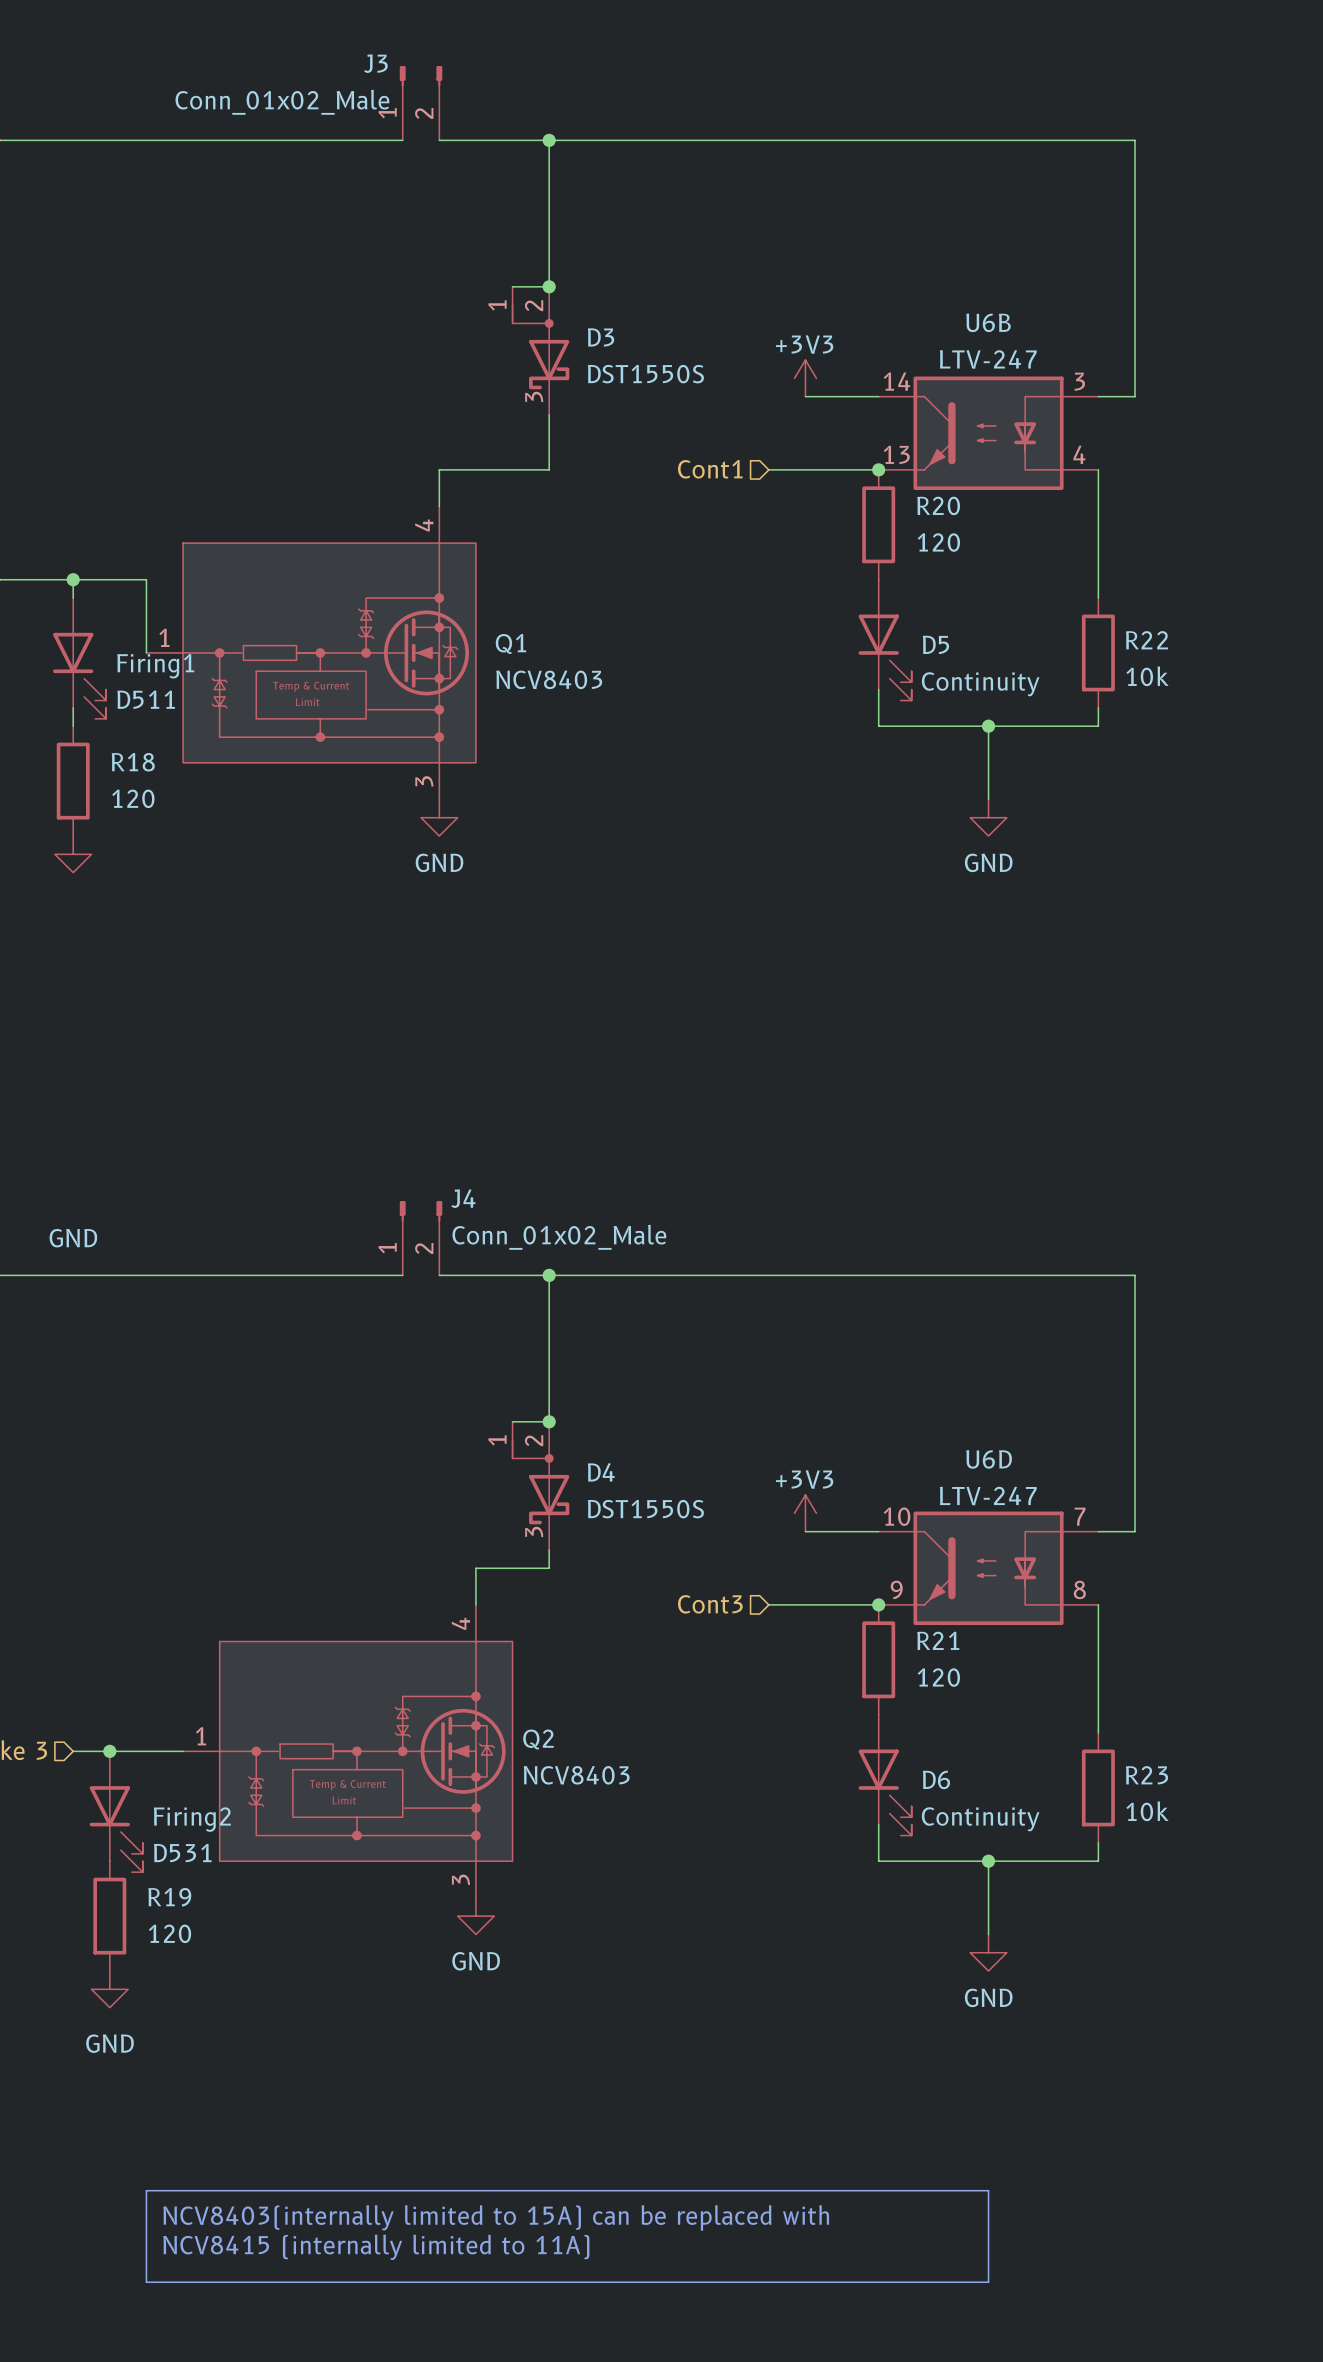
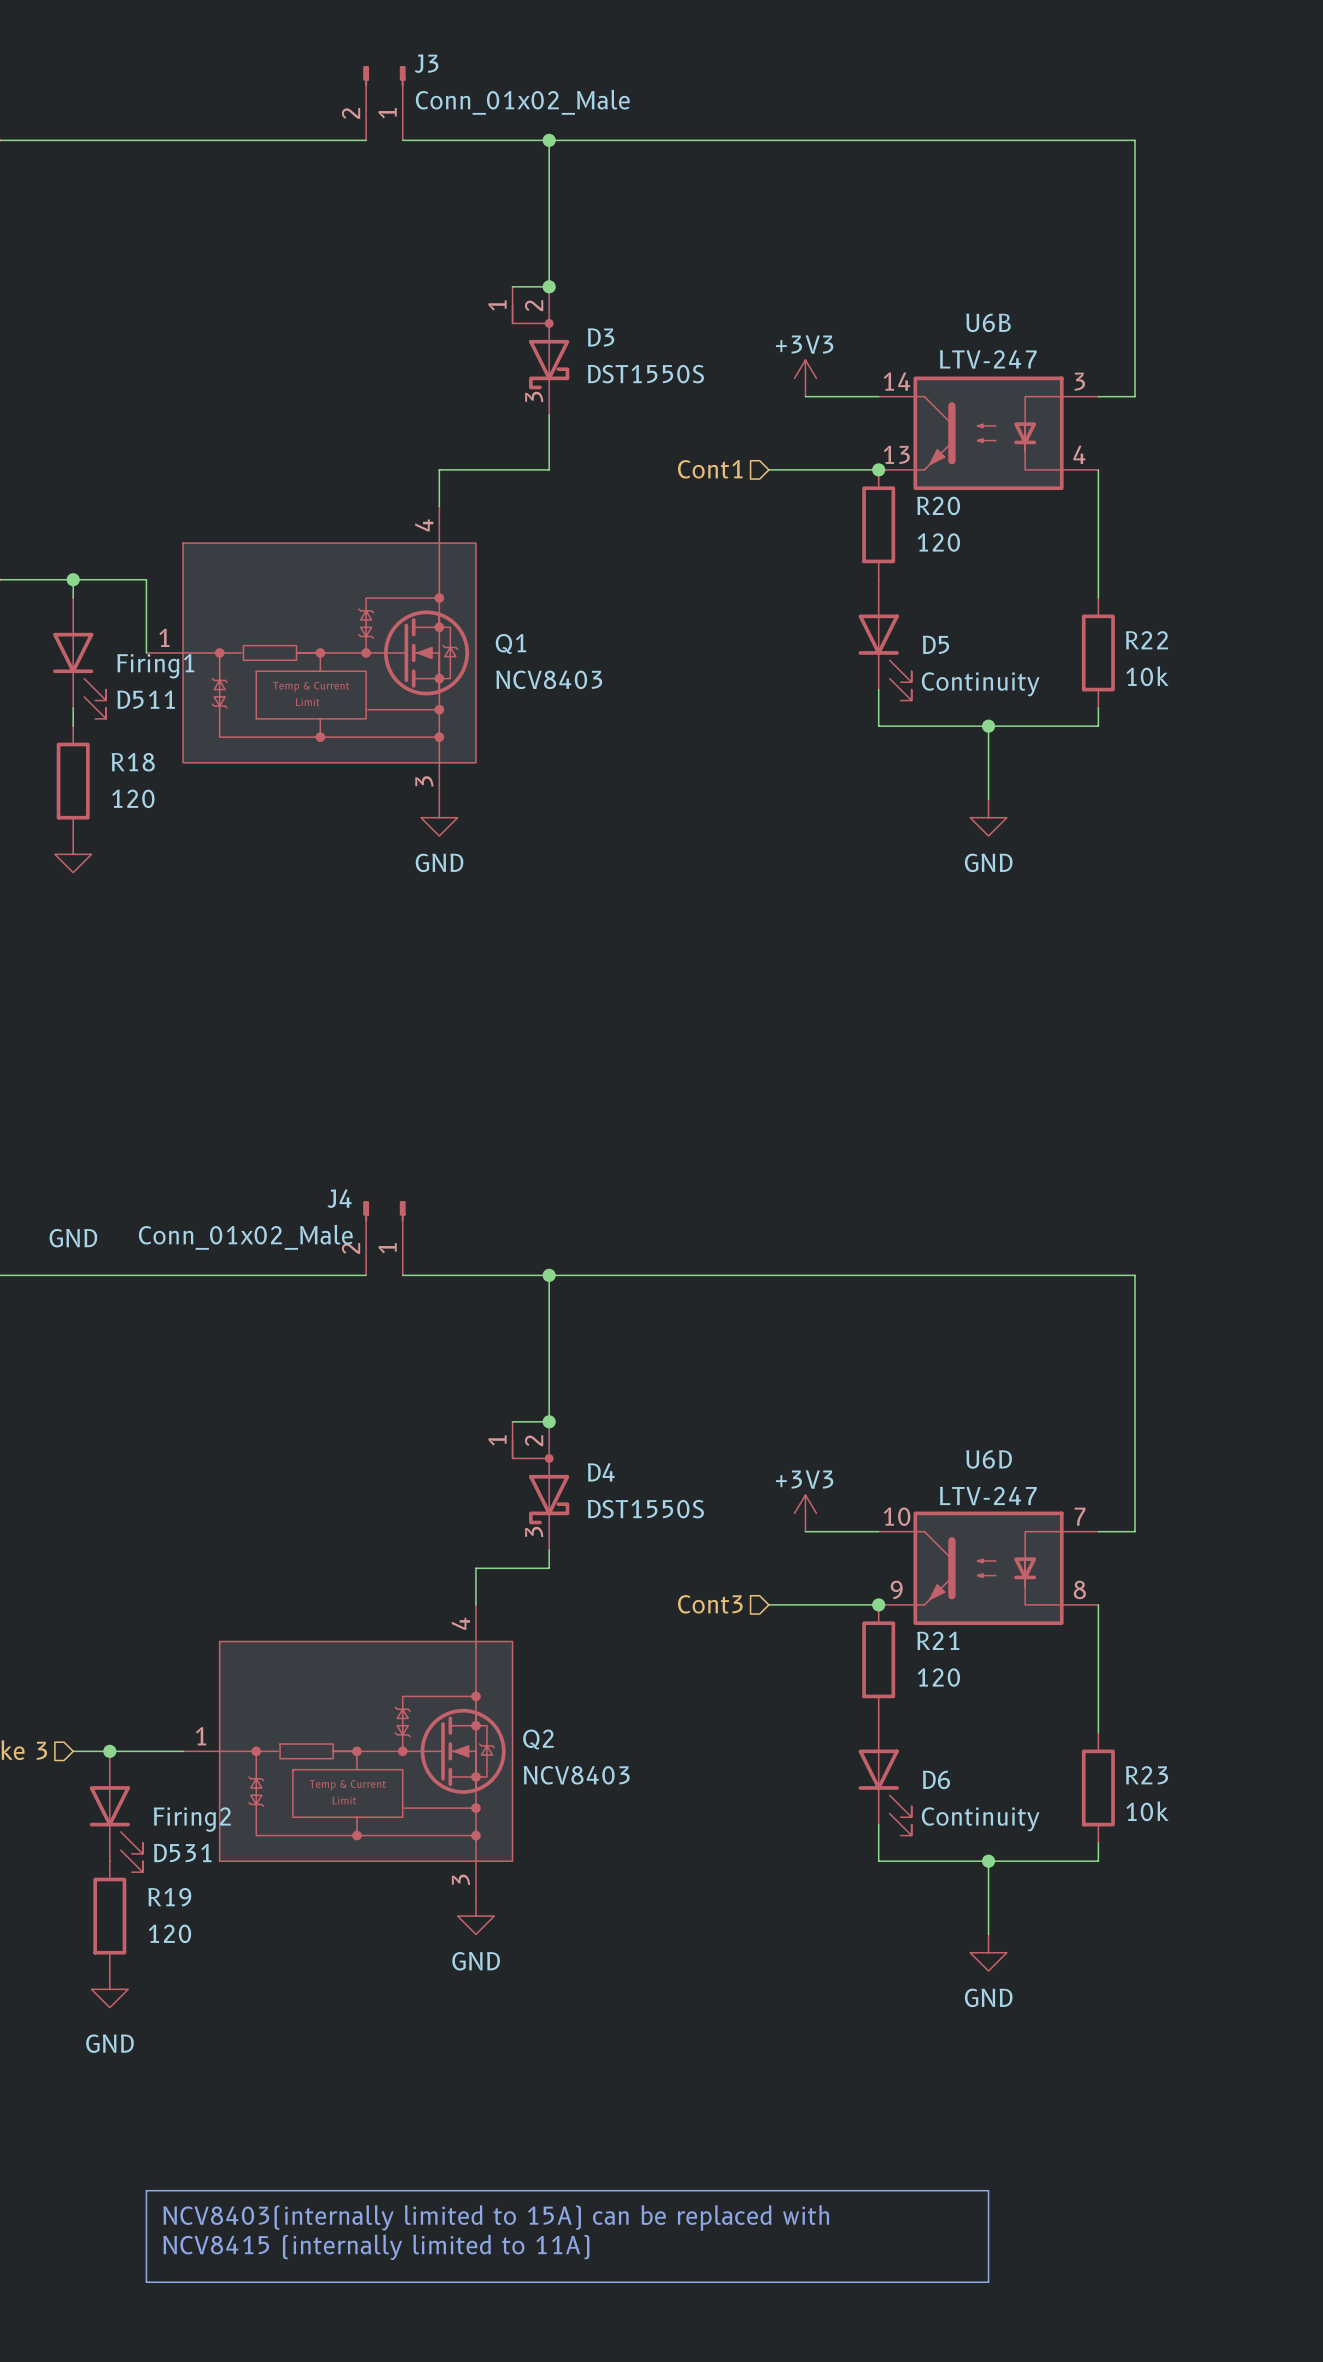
J3 flip: as is (421, 76) -> left-right (384, 76)
wire: (366, 140) (402, 140) -> (439, 140) (402, 140)
J4 flip: as is (421, 1211) -> left-right (384, 1211)
wire: (366, 1275) (402, 1275) -> (439, 1275) (402, 1275)

